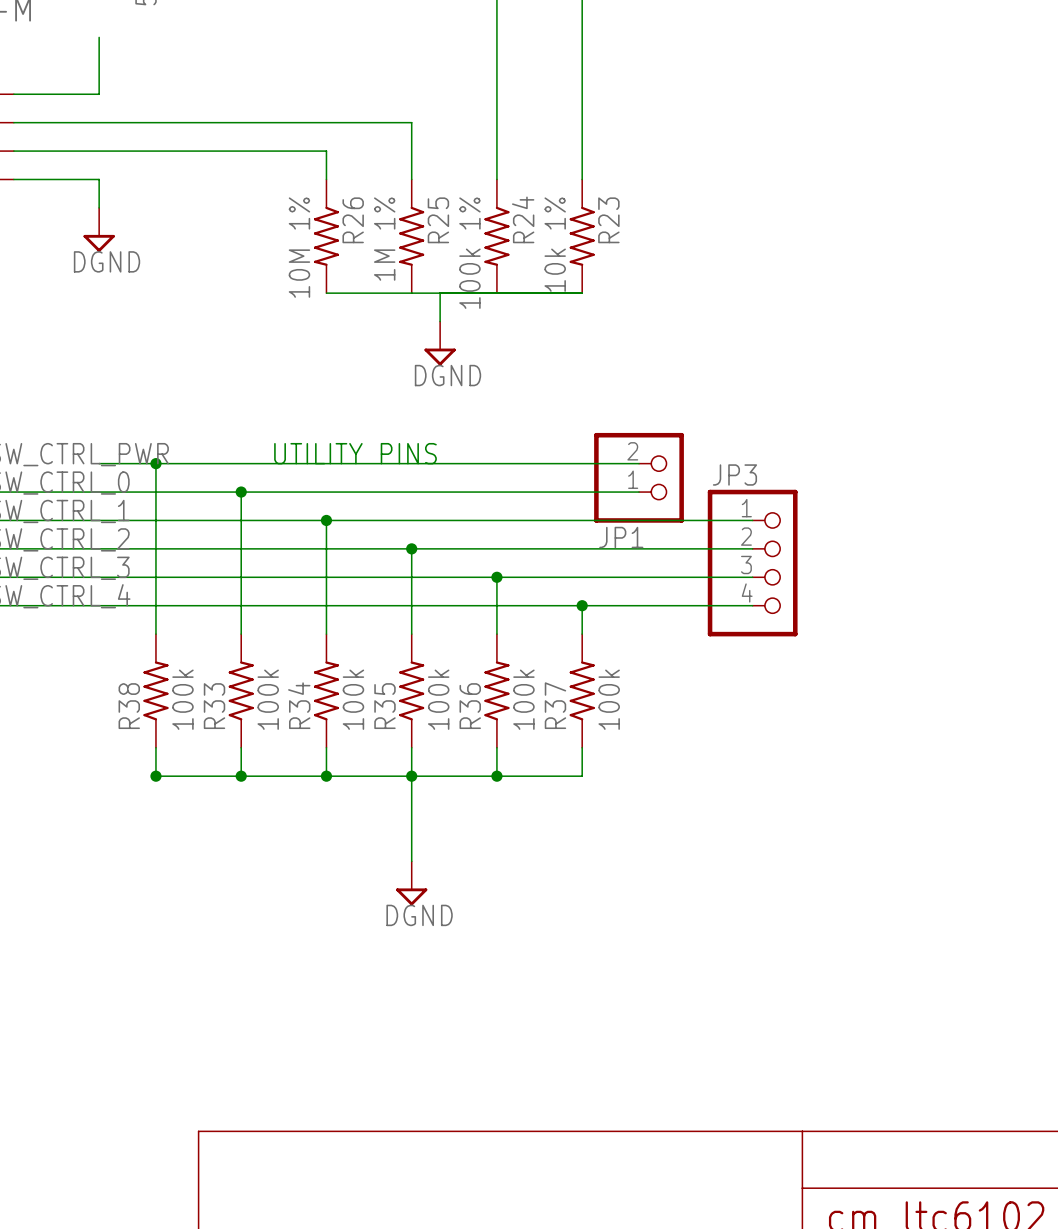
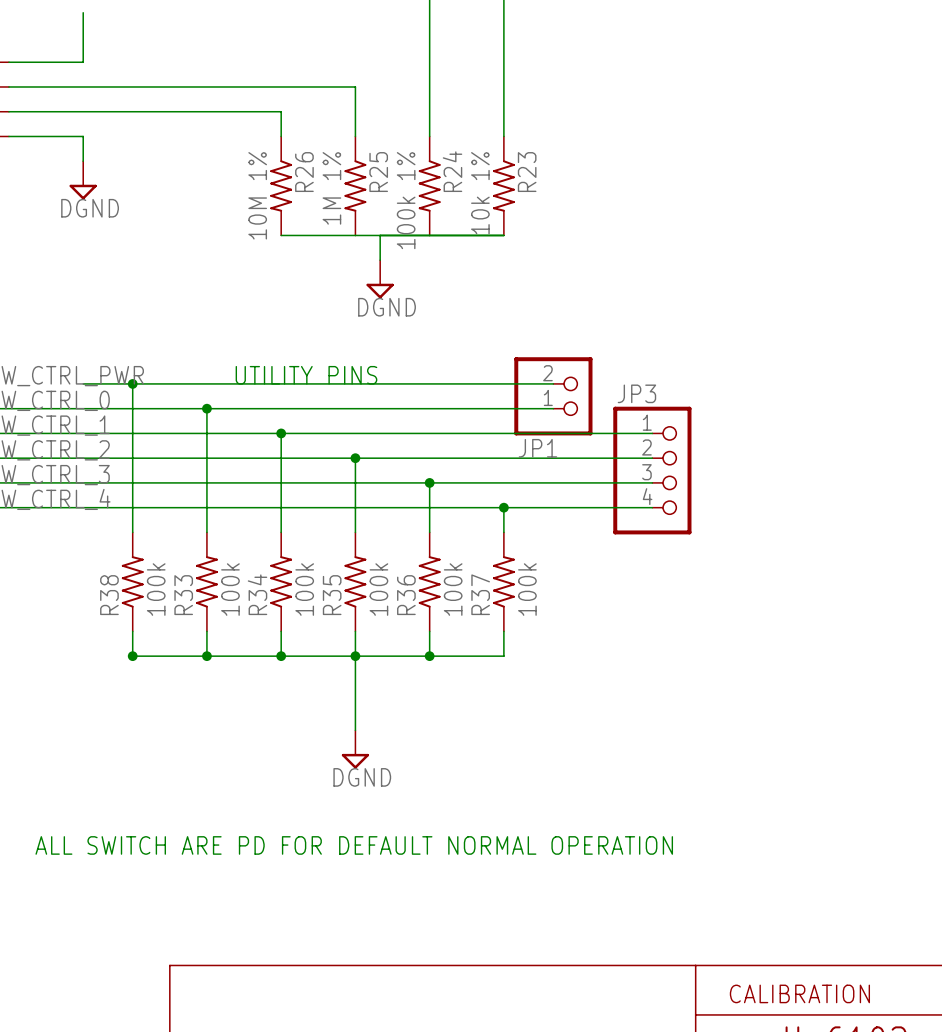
text: none -> ALL SWITCH ARE PD FOR DEFAULT NORMAL OPERATION (354, 845)
text: none -> CALIBRATION (799, 993)

